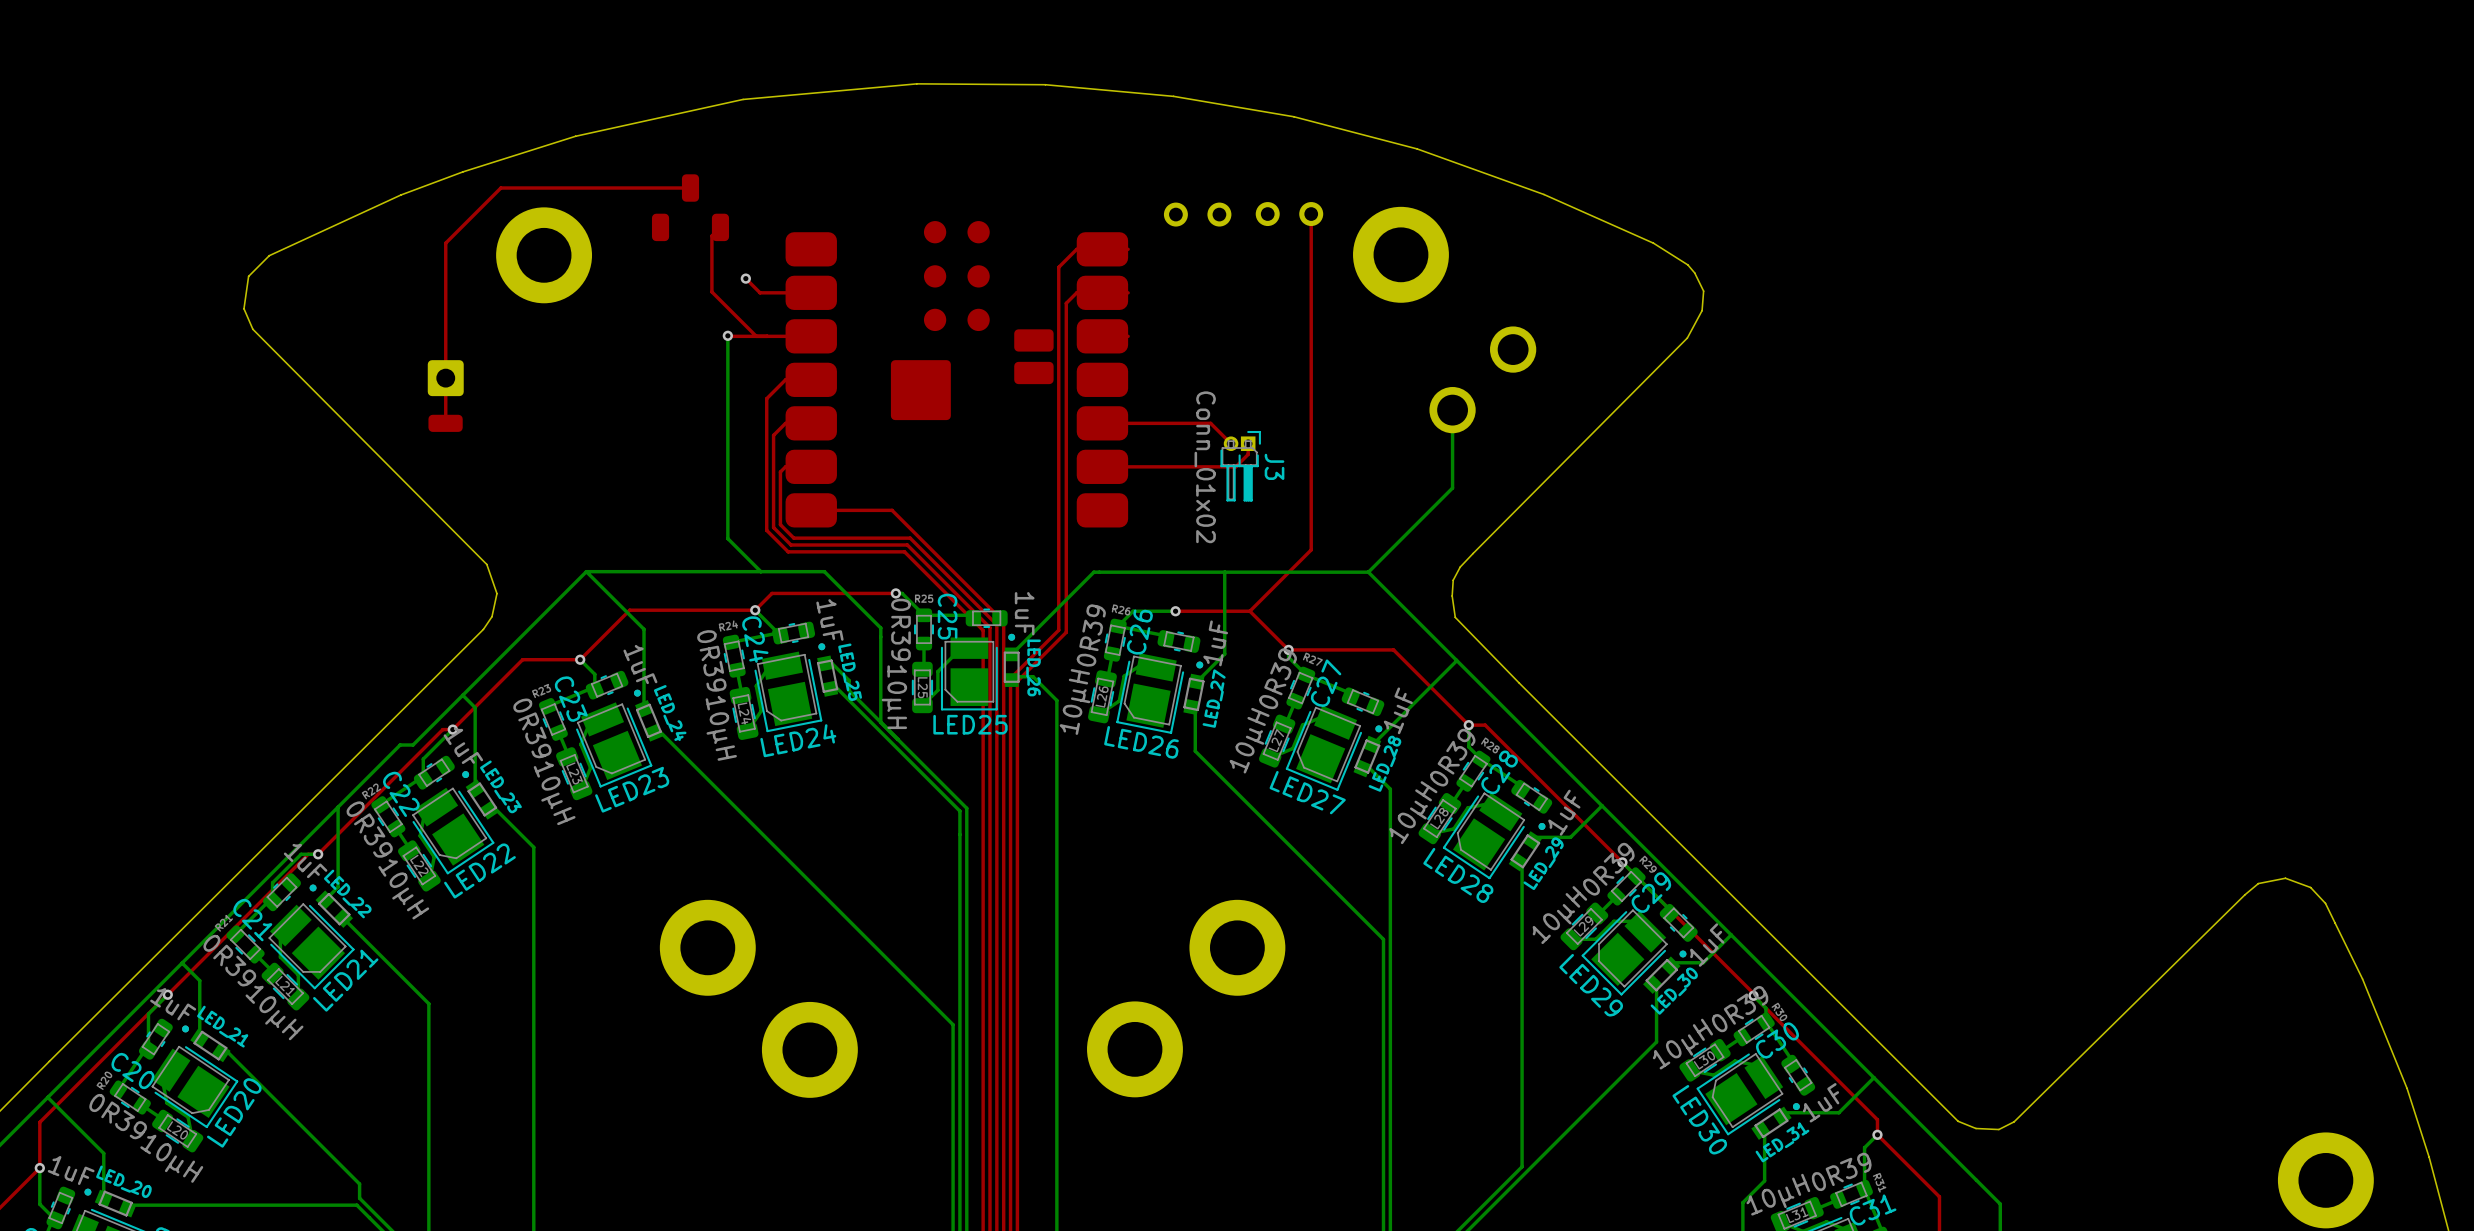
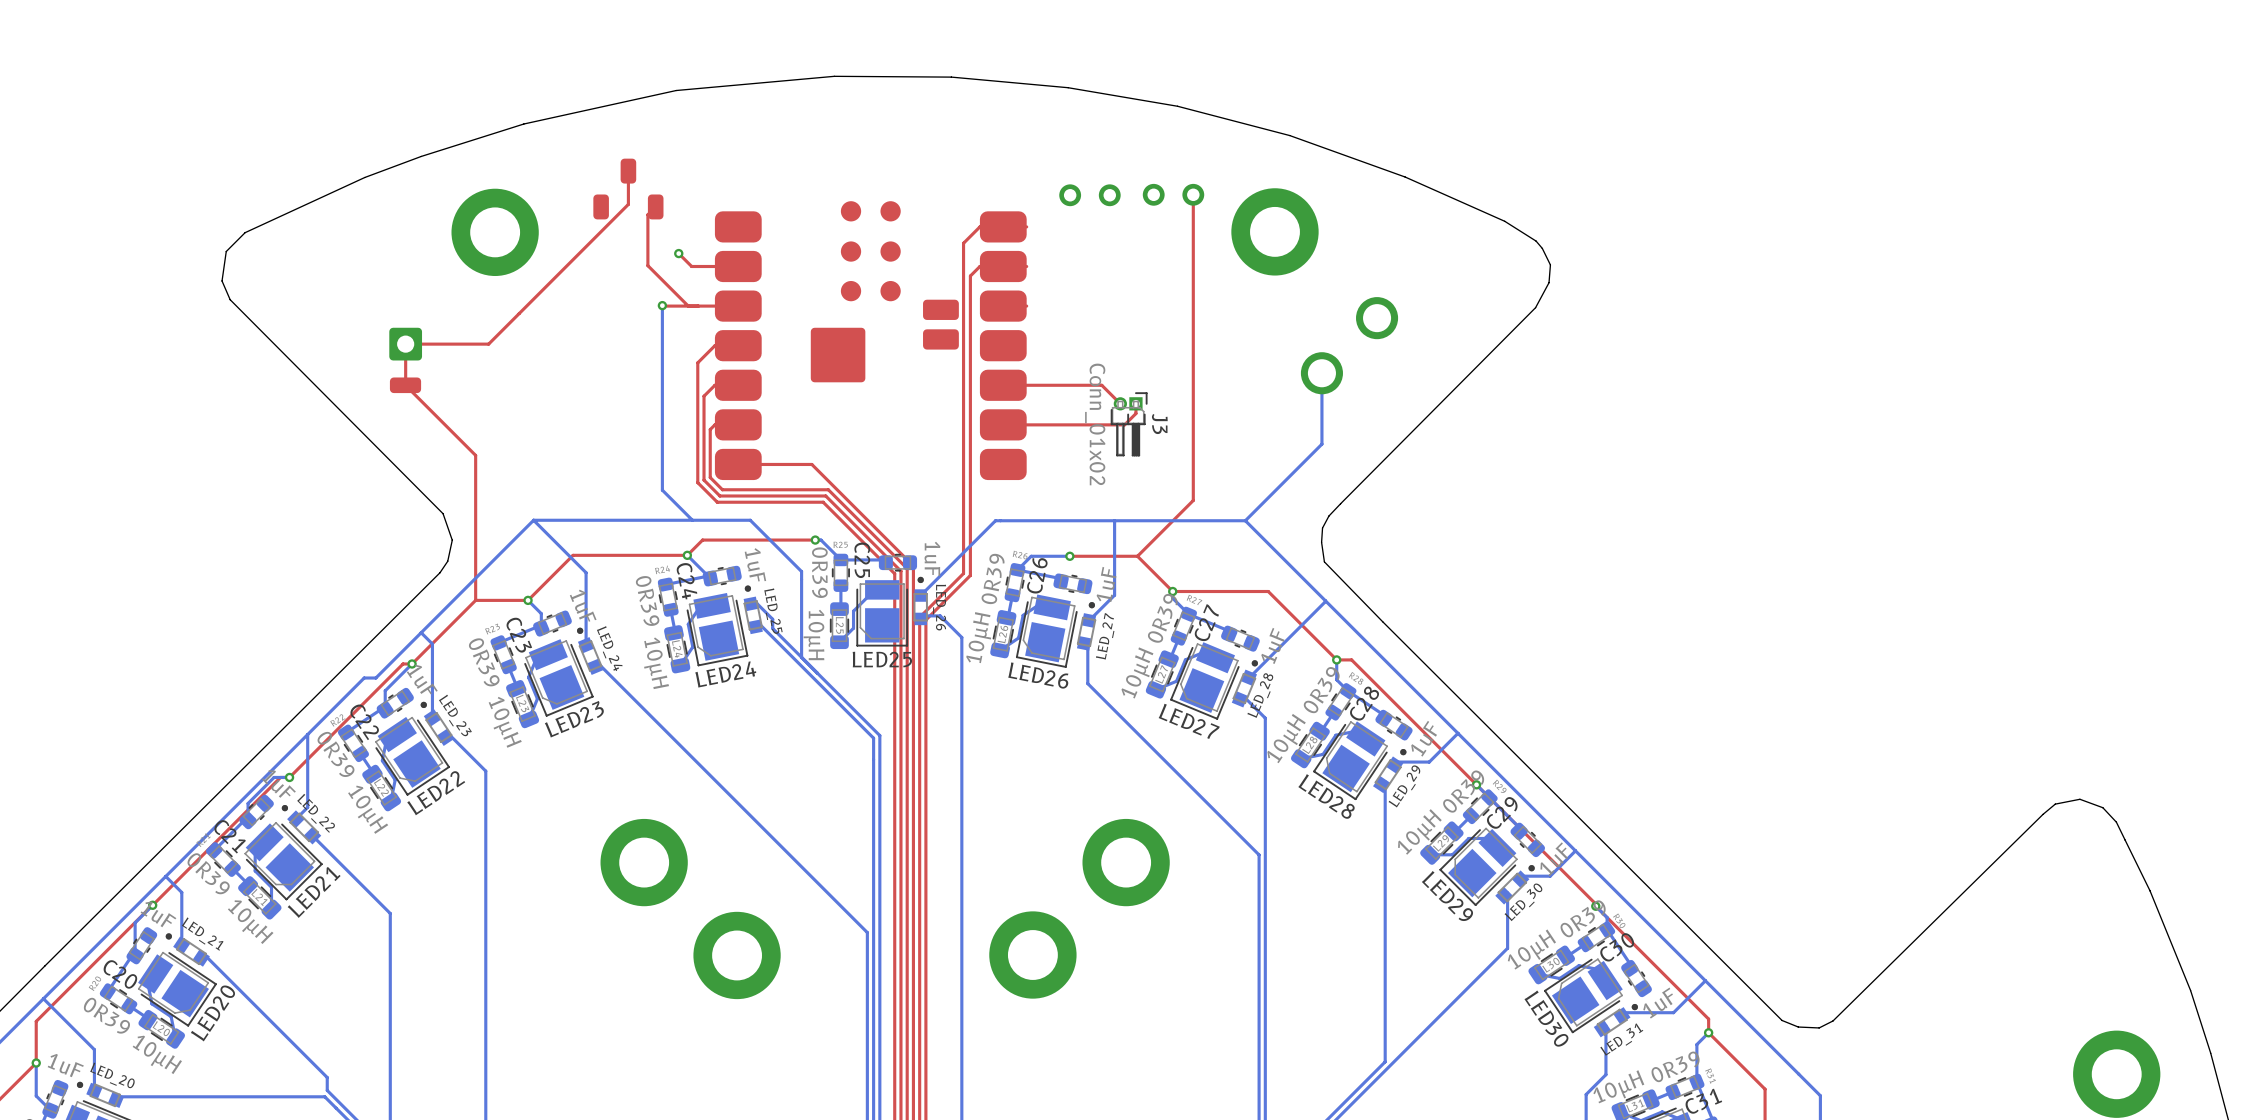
top track: (690, 188) (500, 188) (445, 243) (445, 378) -> (628, 171) (628, 204) (488, 344) (405, 344)
top track: none -> (405, 385) (475, 455) (475, 600)

